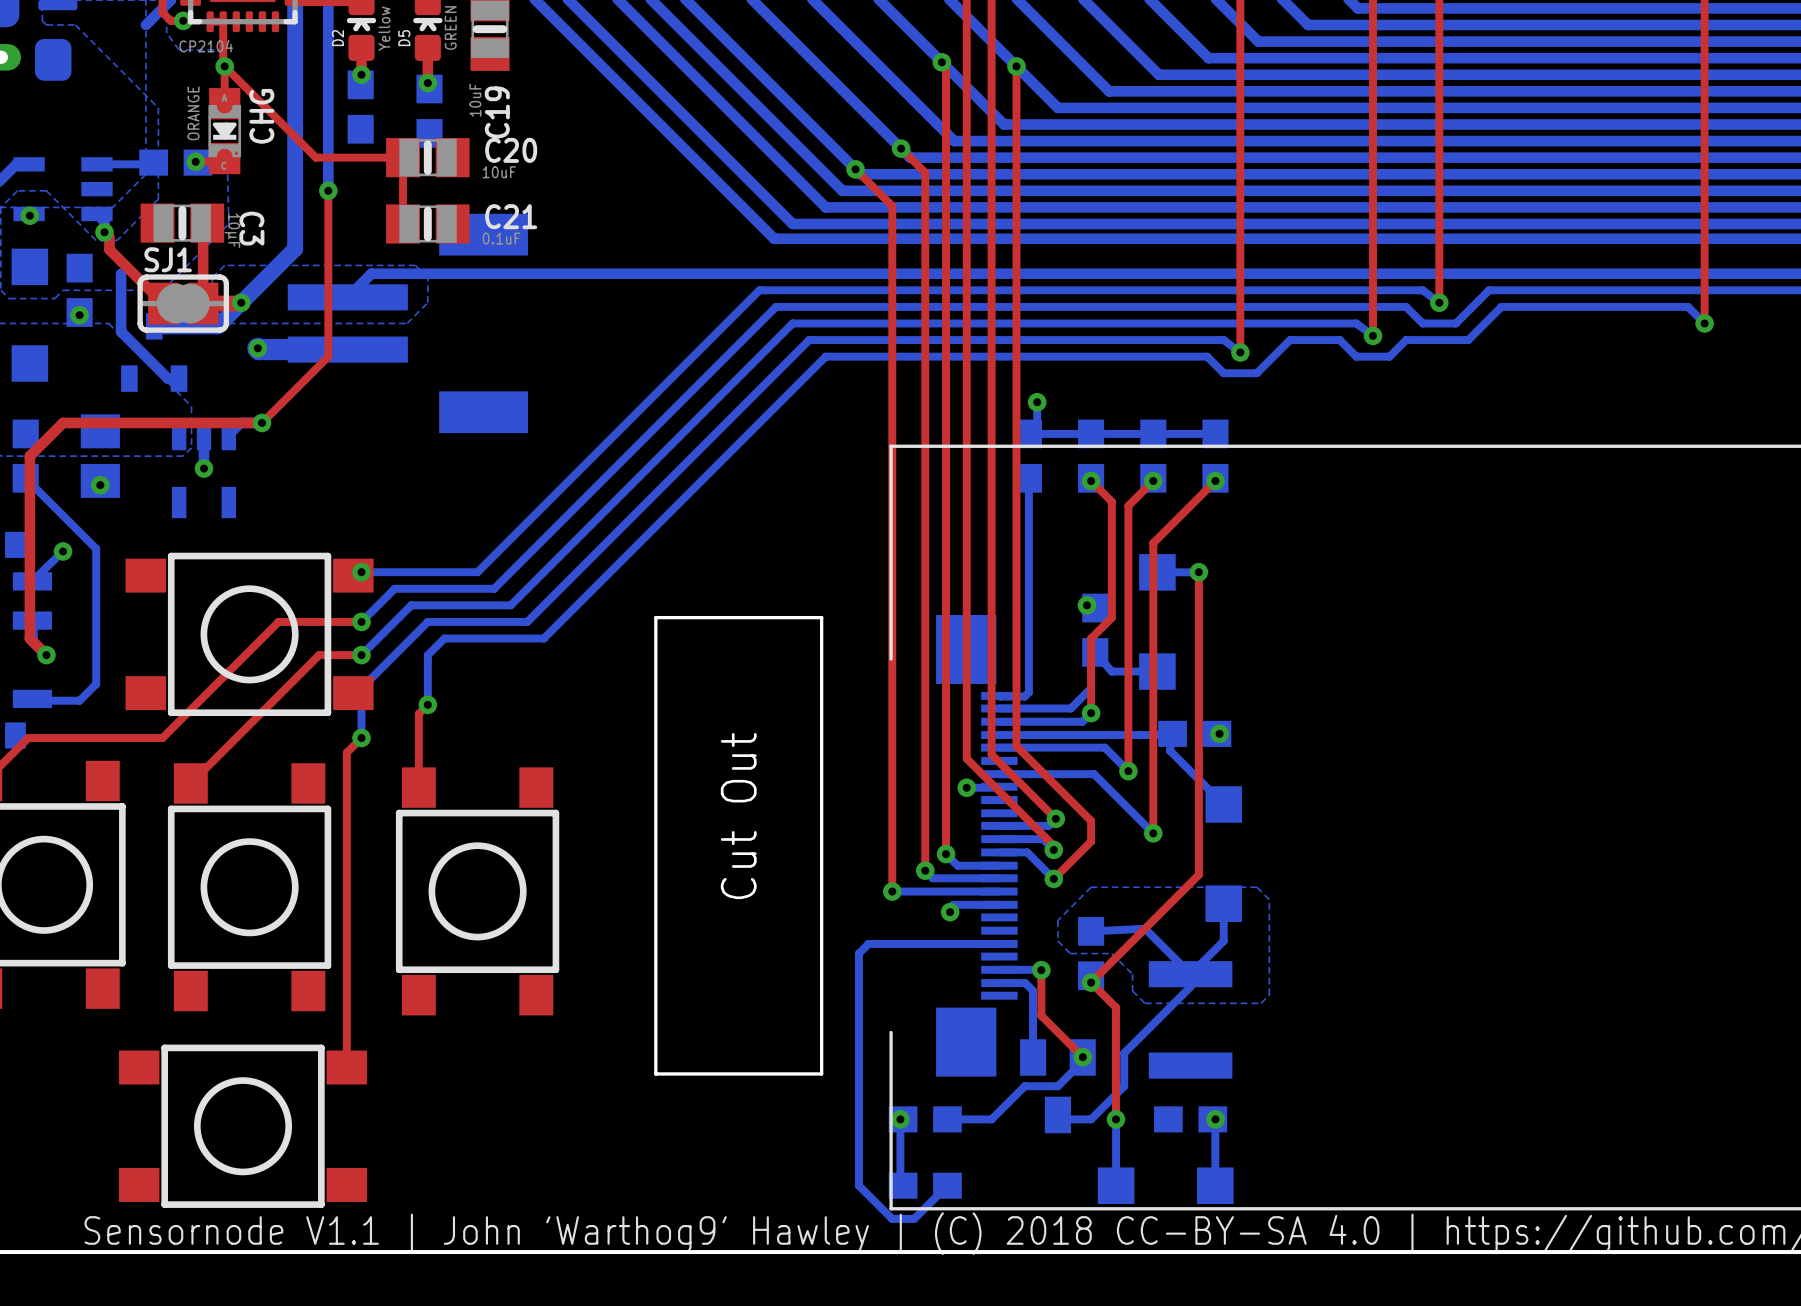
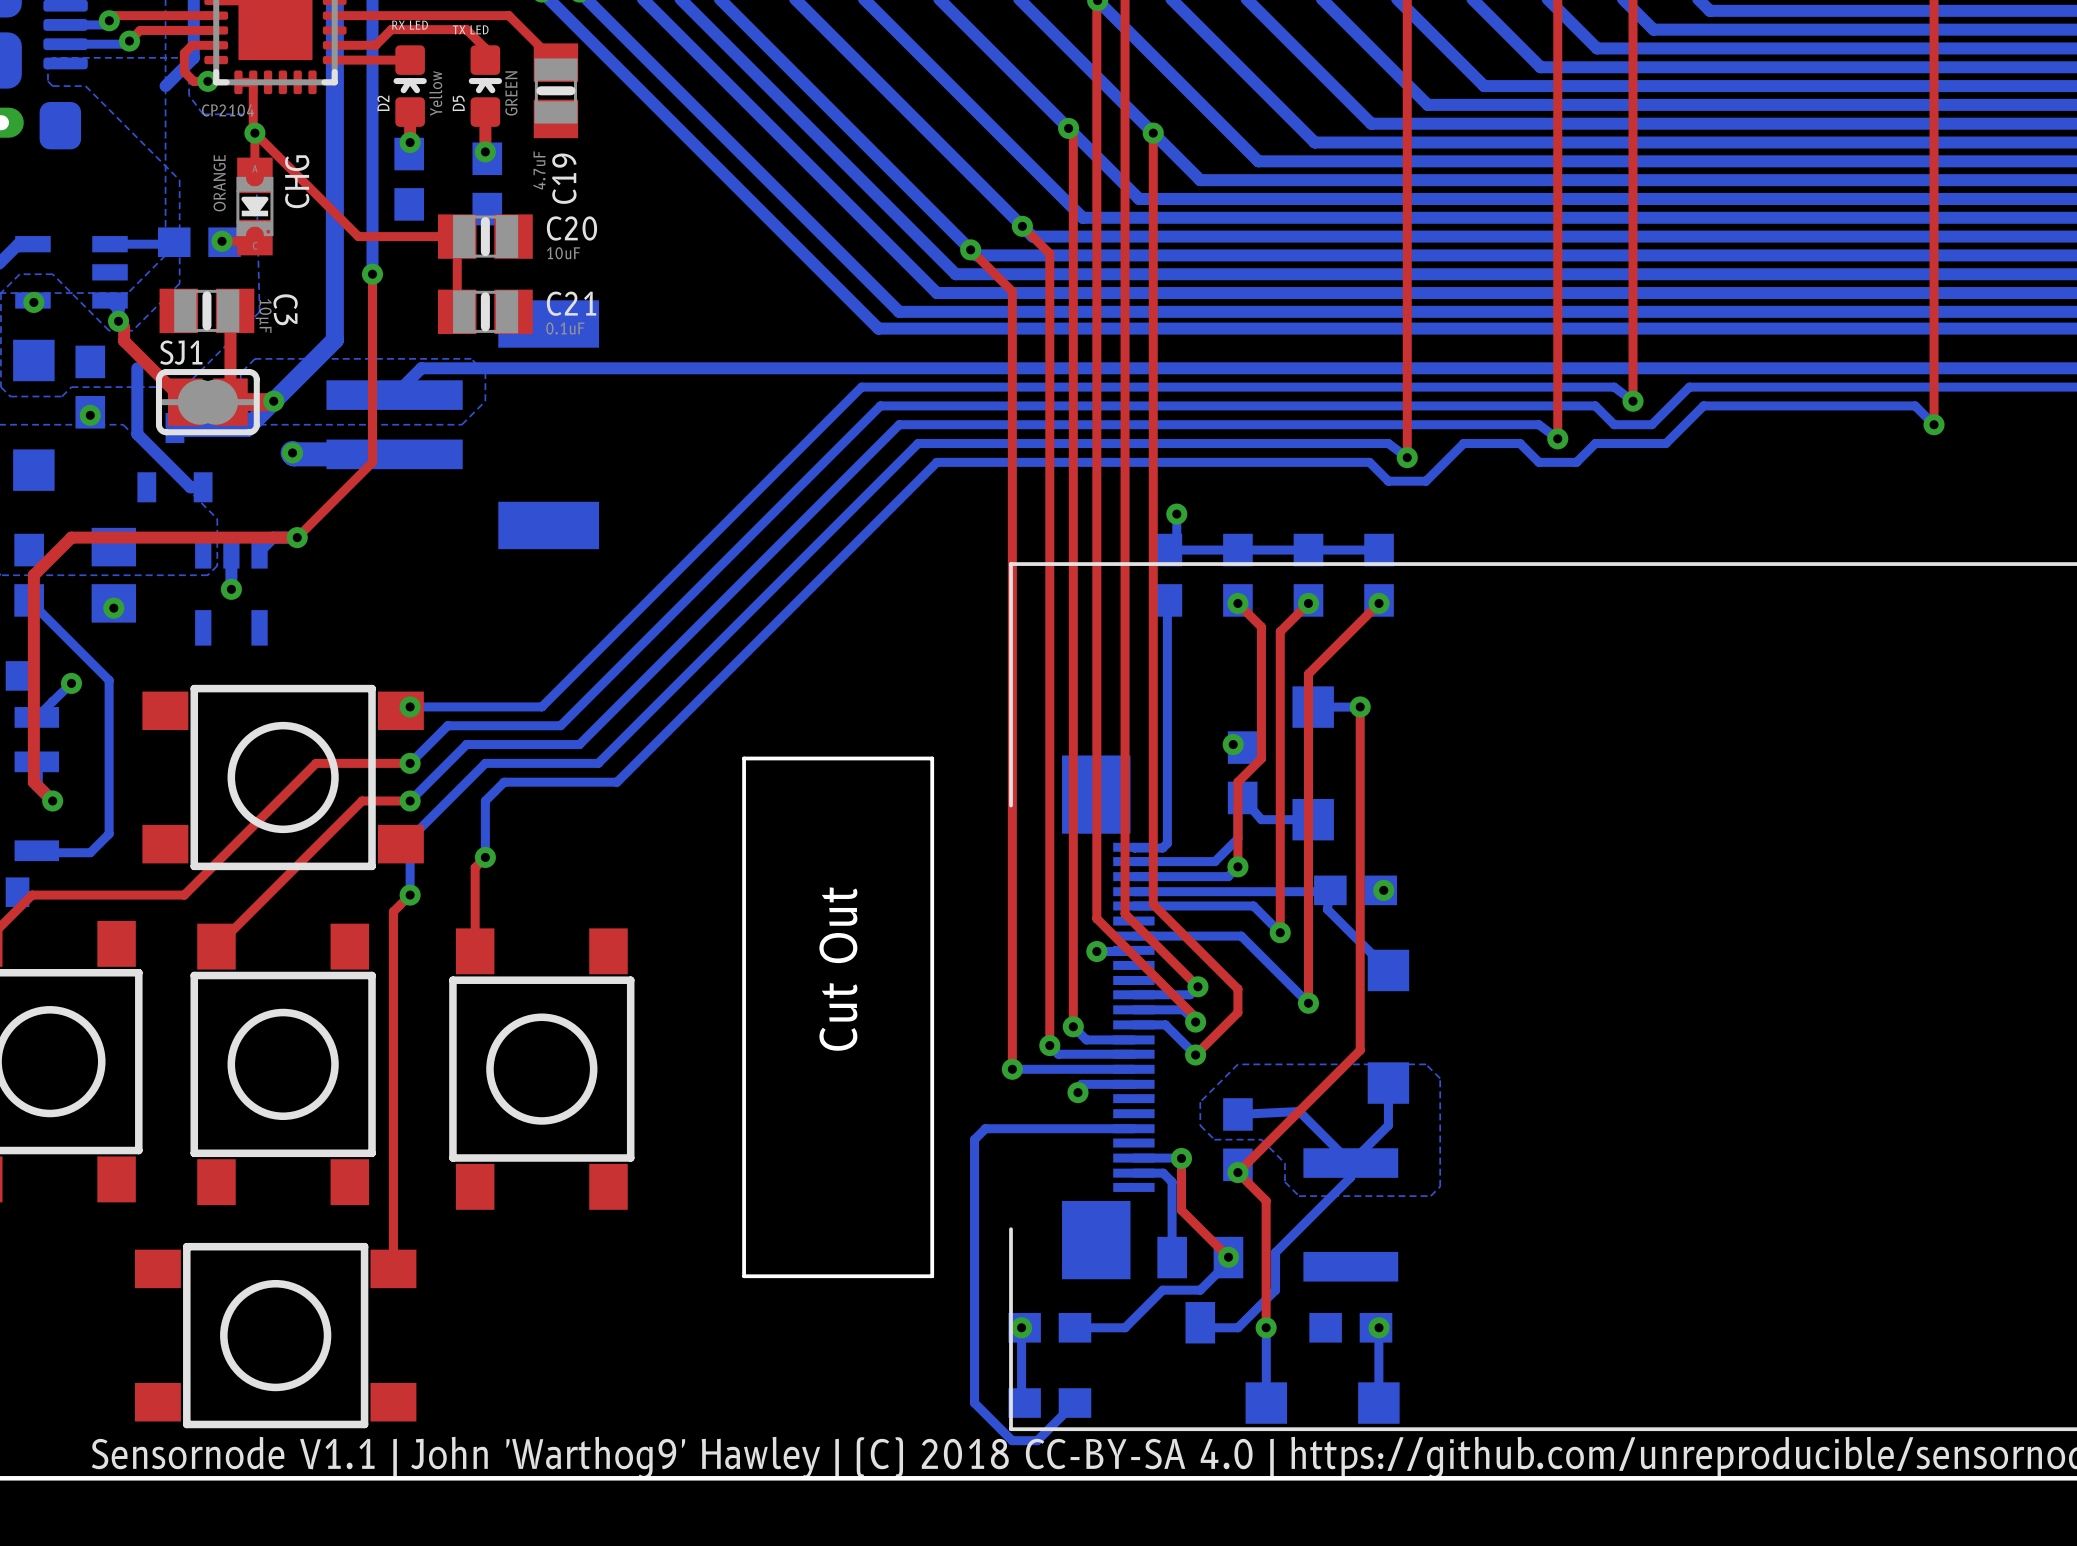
C19 value: 10uF (475, 100) -> 4.7uF (539, 170)

